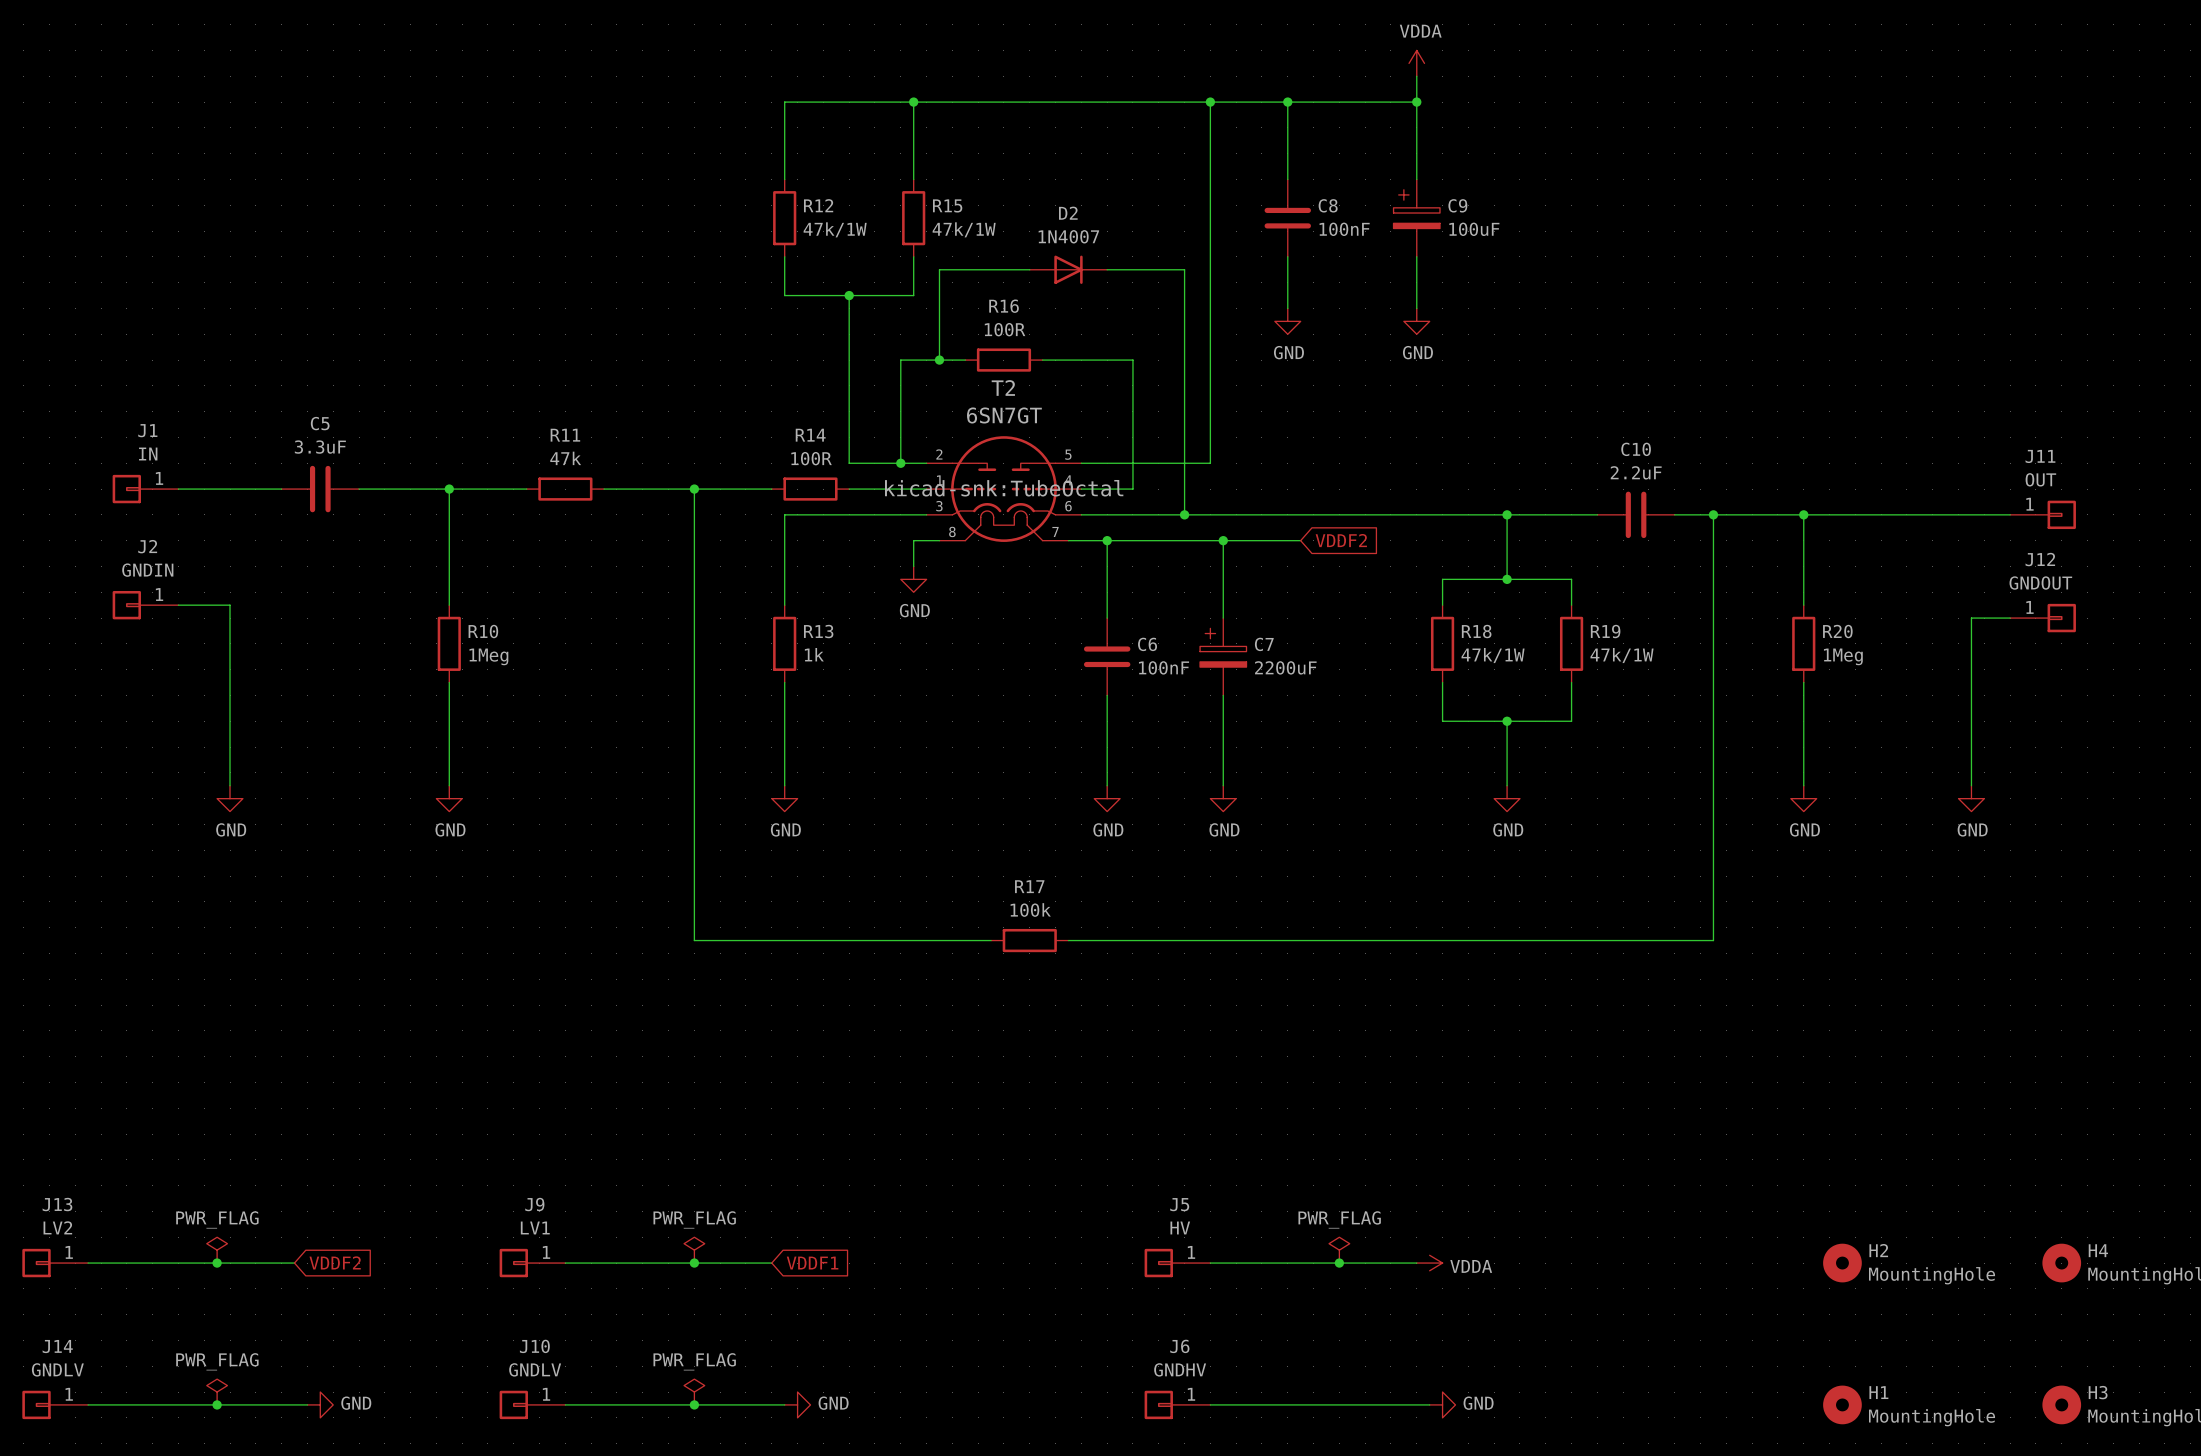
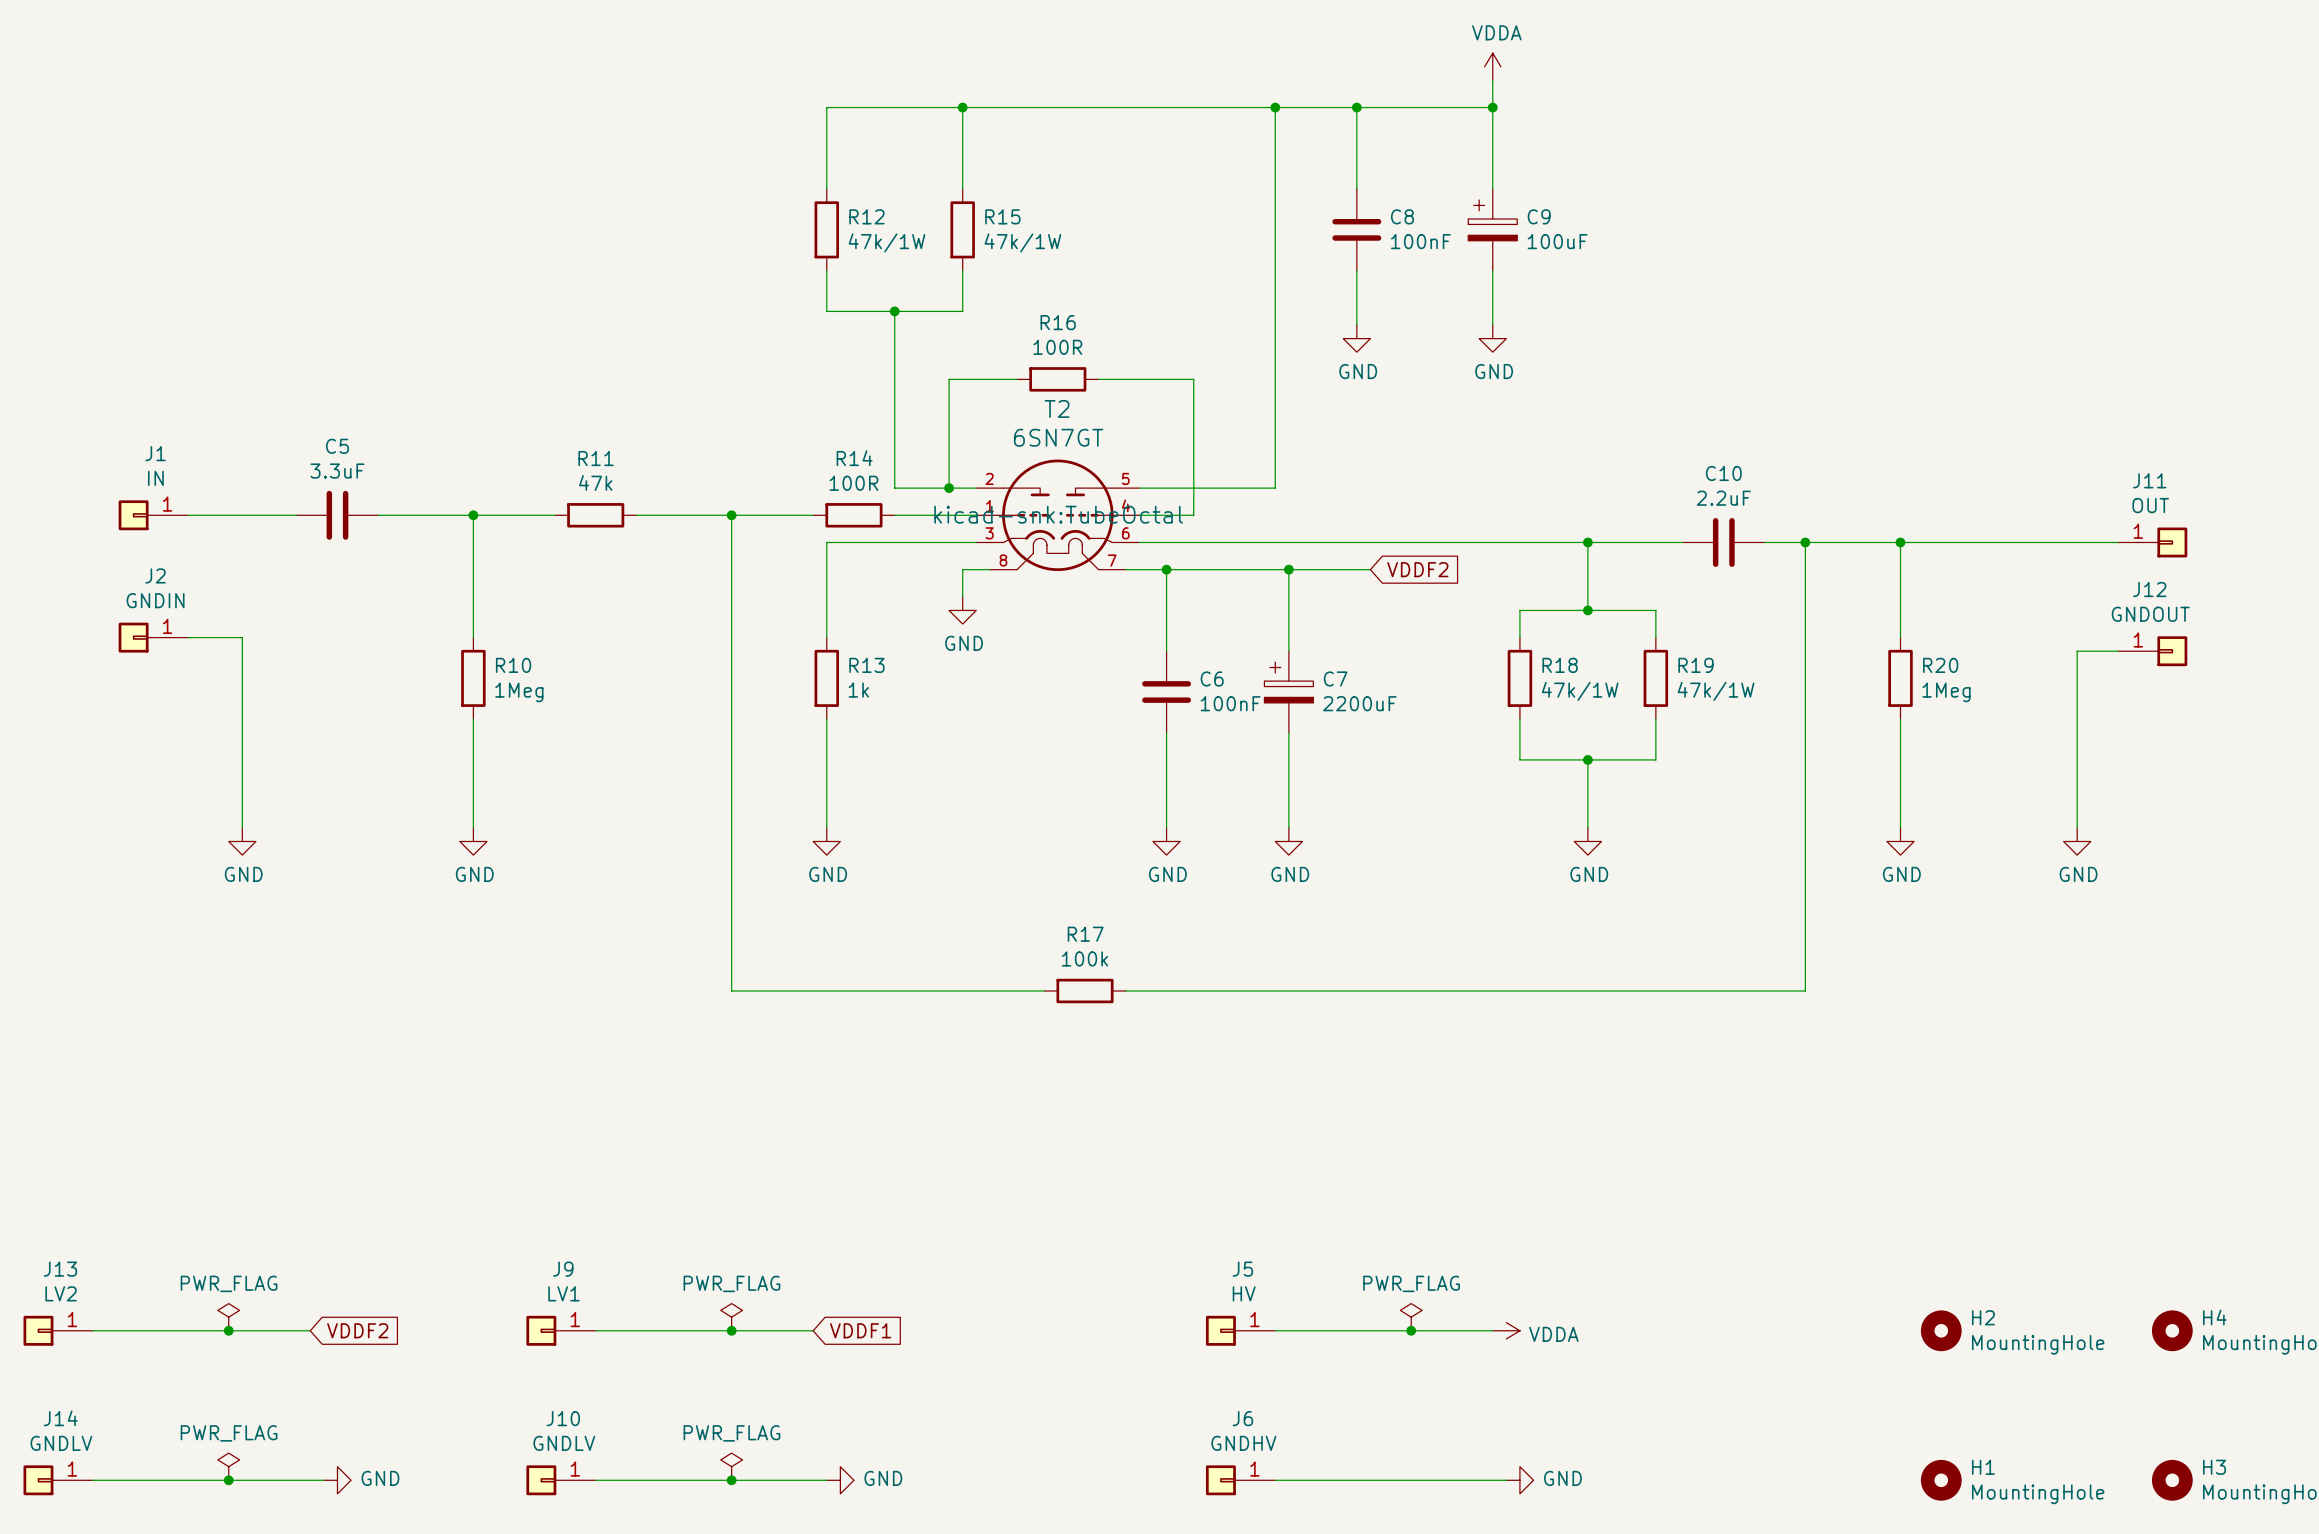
wire: (1029, 269) (939, 269) (939, 360) -> none
D2: 1N4007 (1068, 269) -> none
wire: (1107, 269) (1184, 269) (1184, 514) -> none
junction: (939, 360) -> none
junction: (1184, 514) -> none

